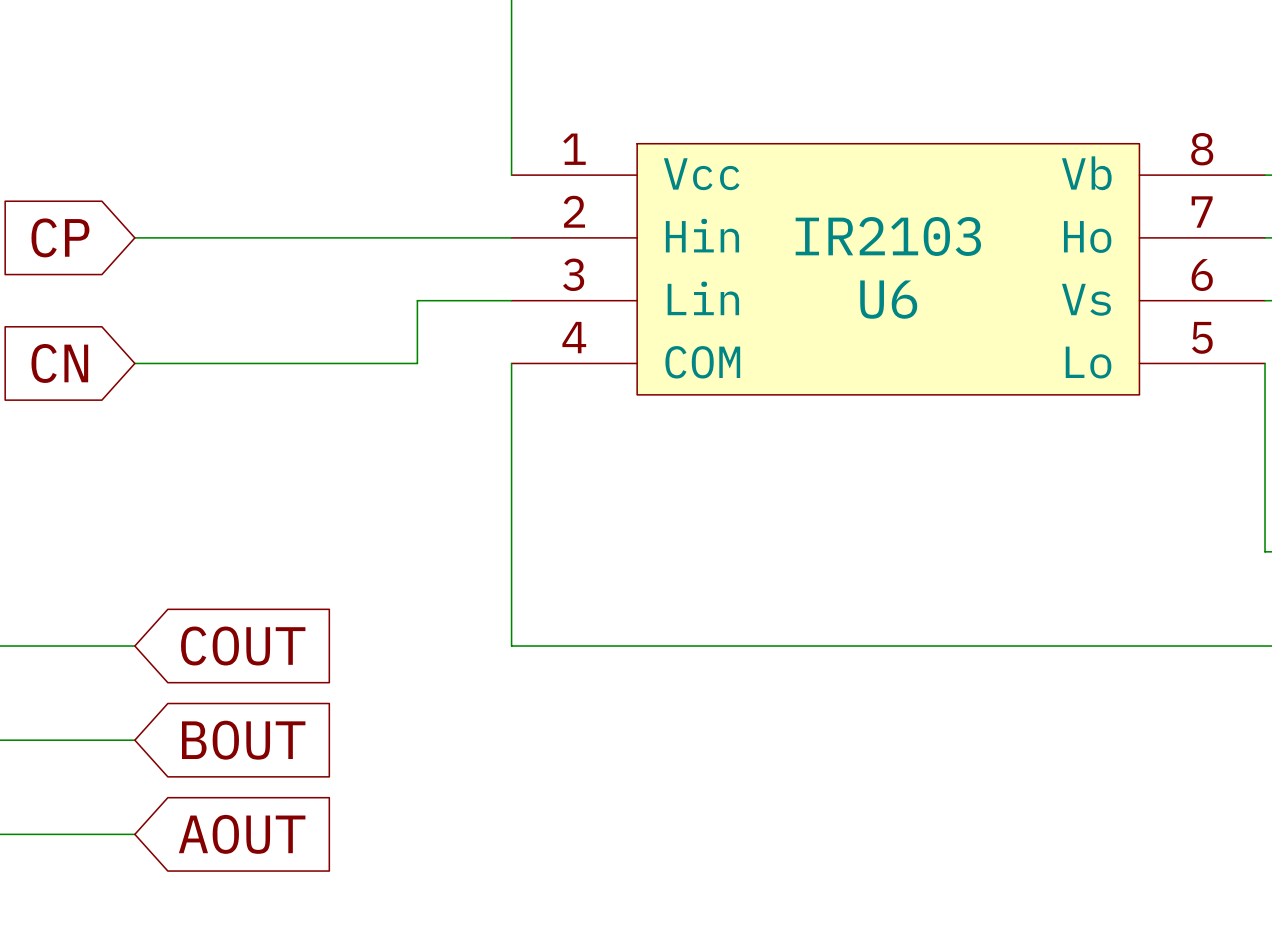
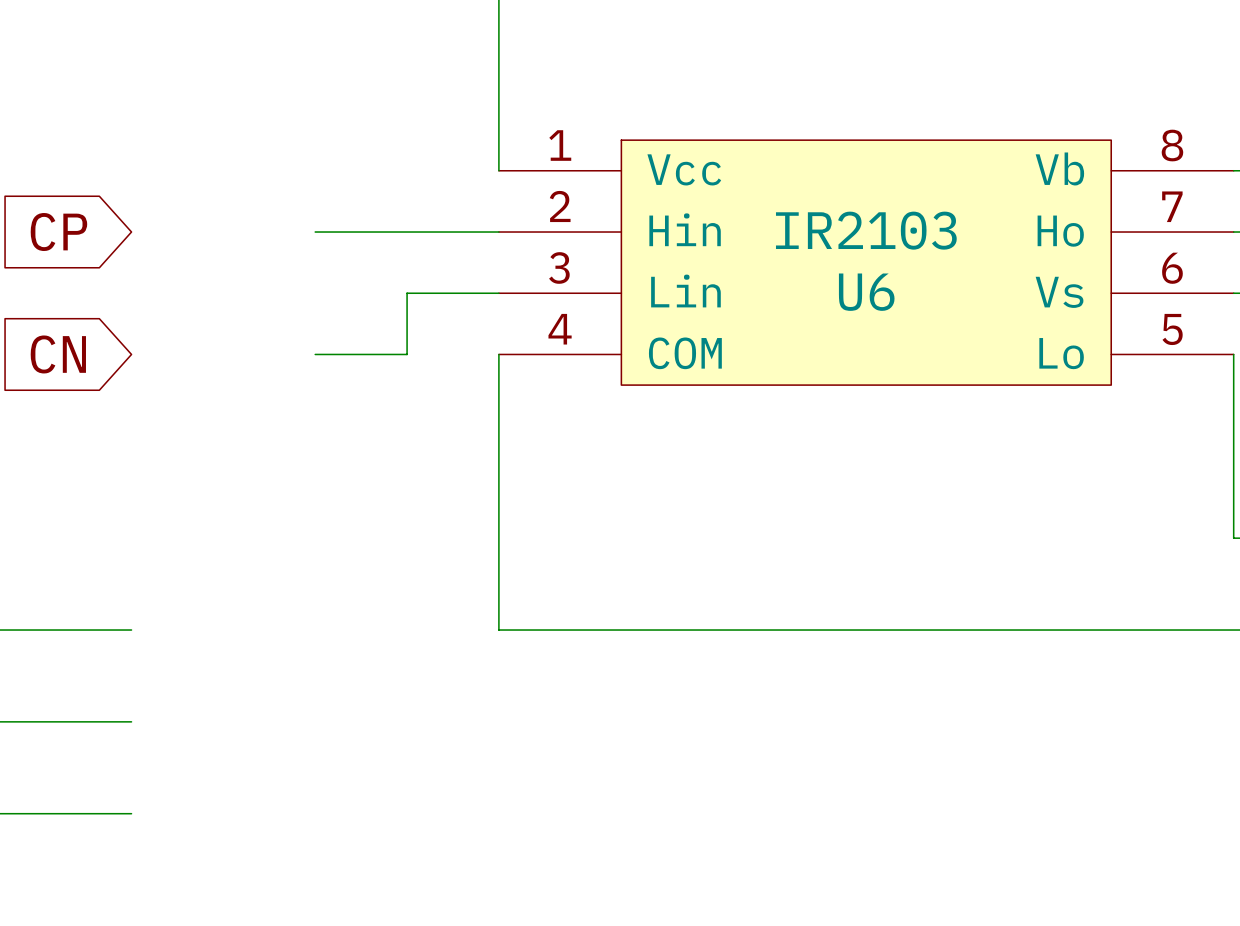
wire: (134, 237) (323, 237) -> none
wire: (134, 363) (323, 363) -> none
global label: COUT (243, 646) -> none
global label: BOUT (243, 740) -> none
global label: AOUT (242, 834) -> none

